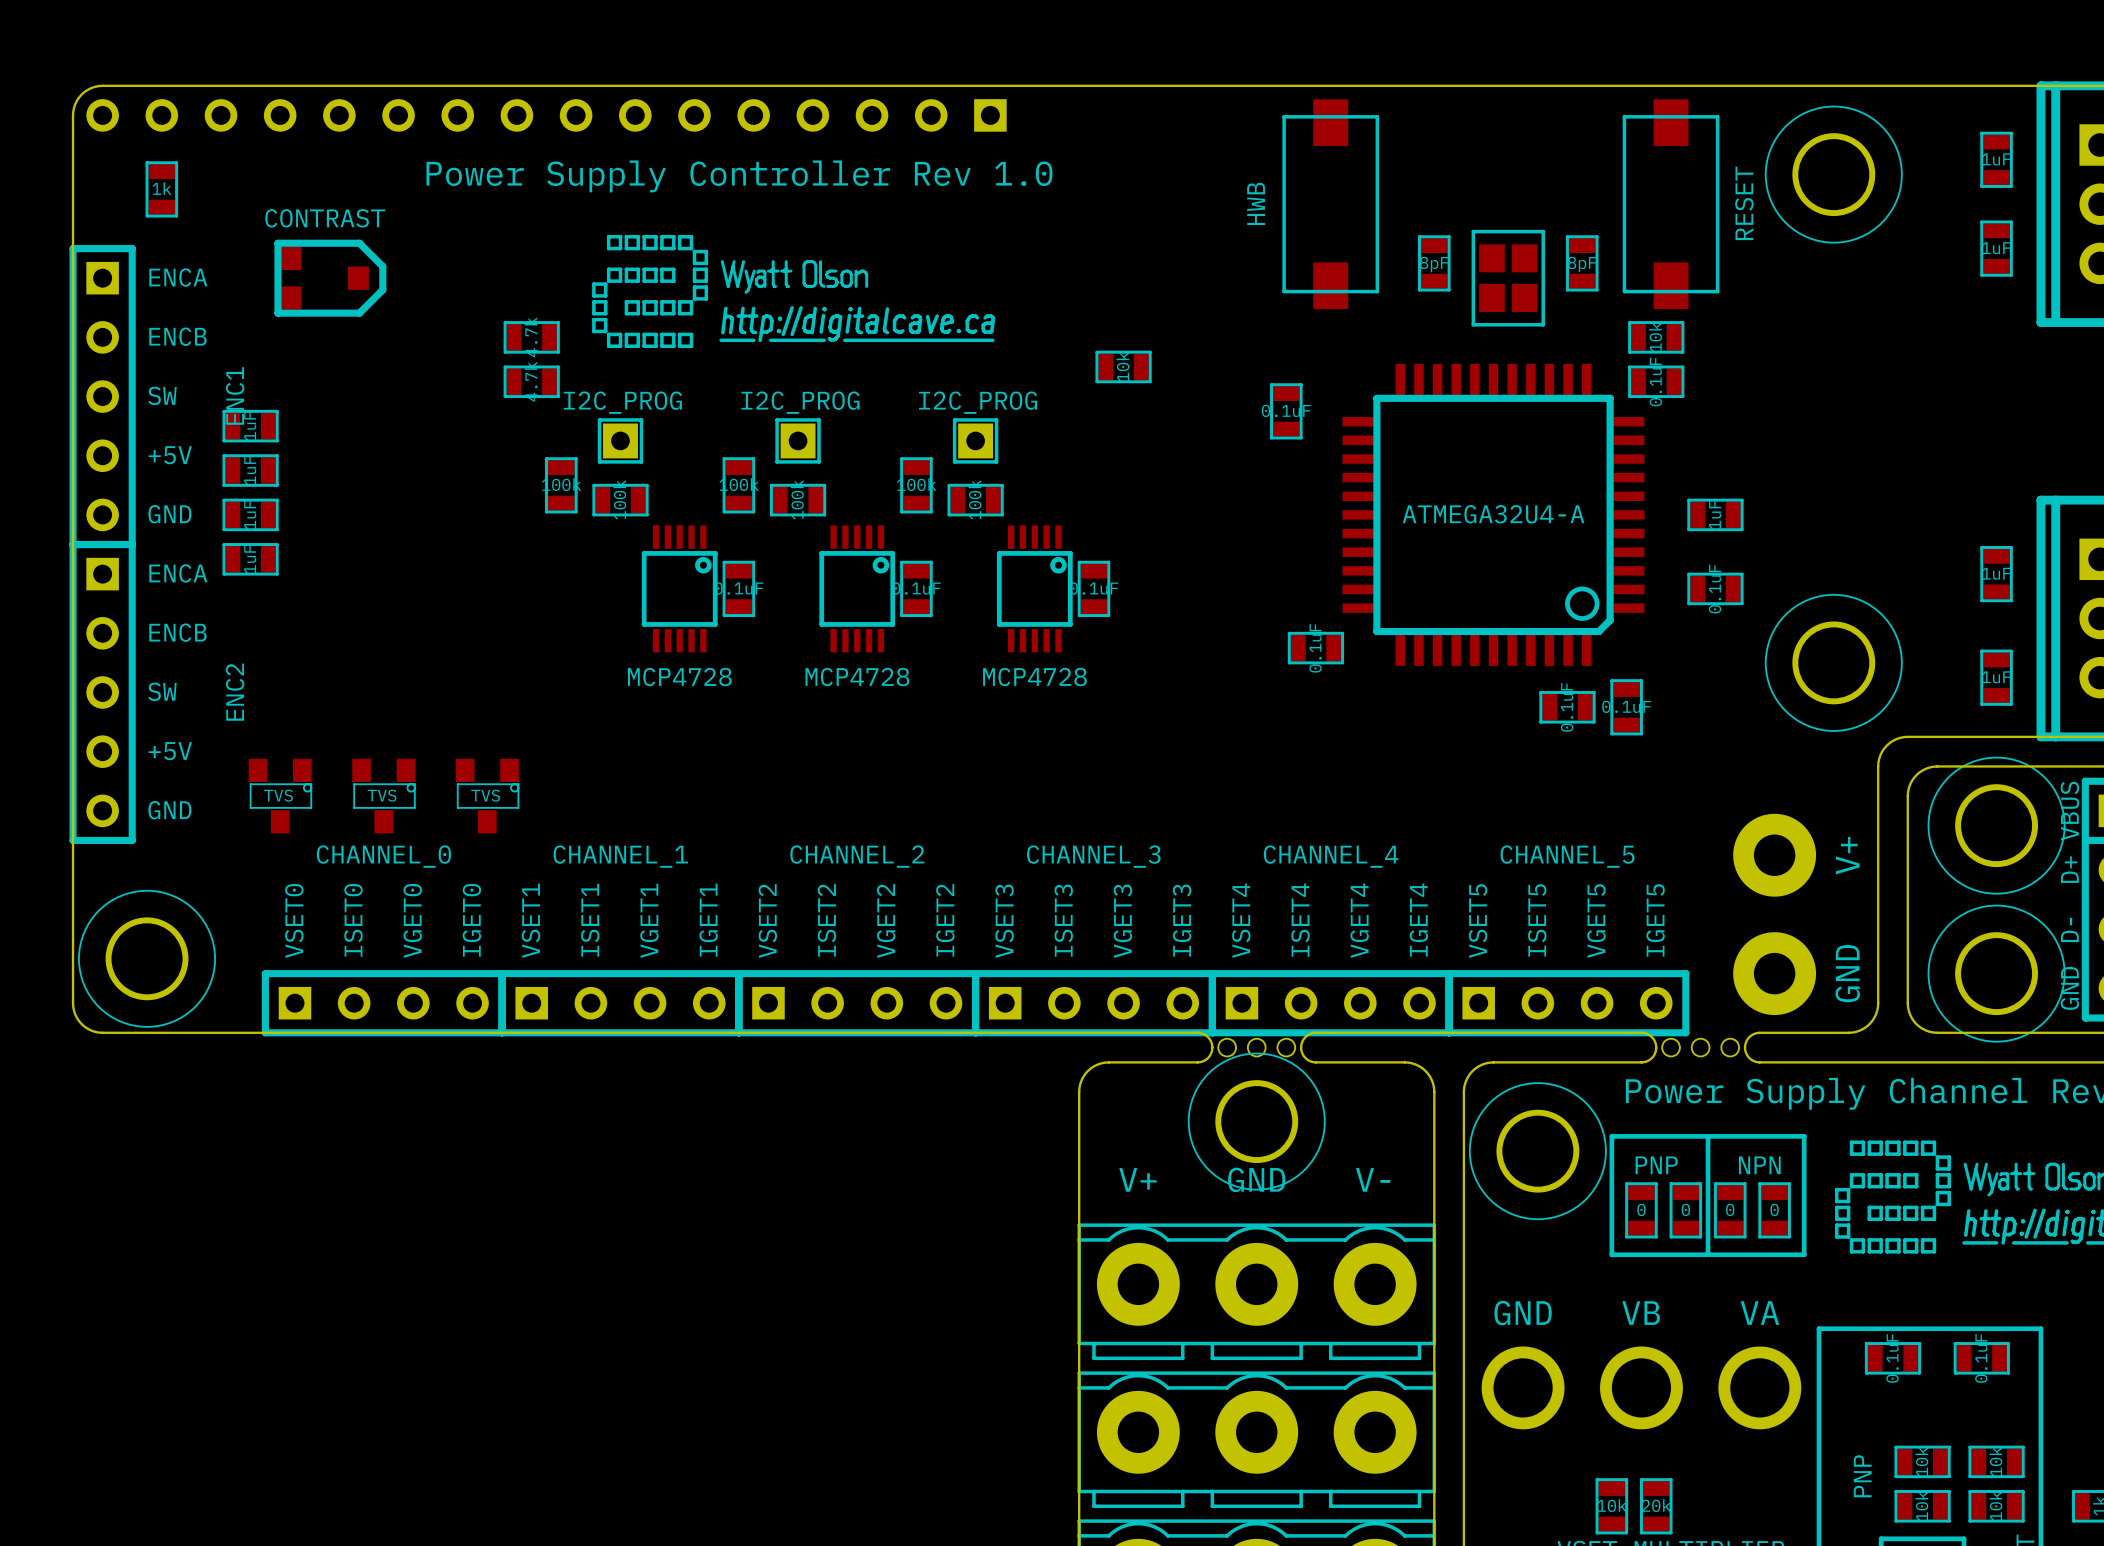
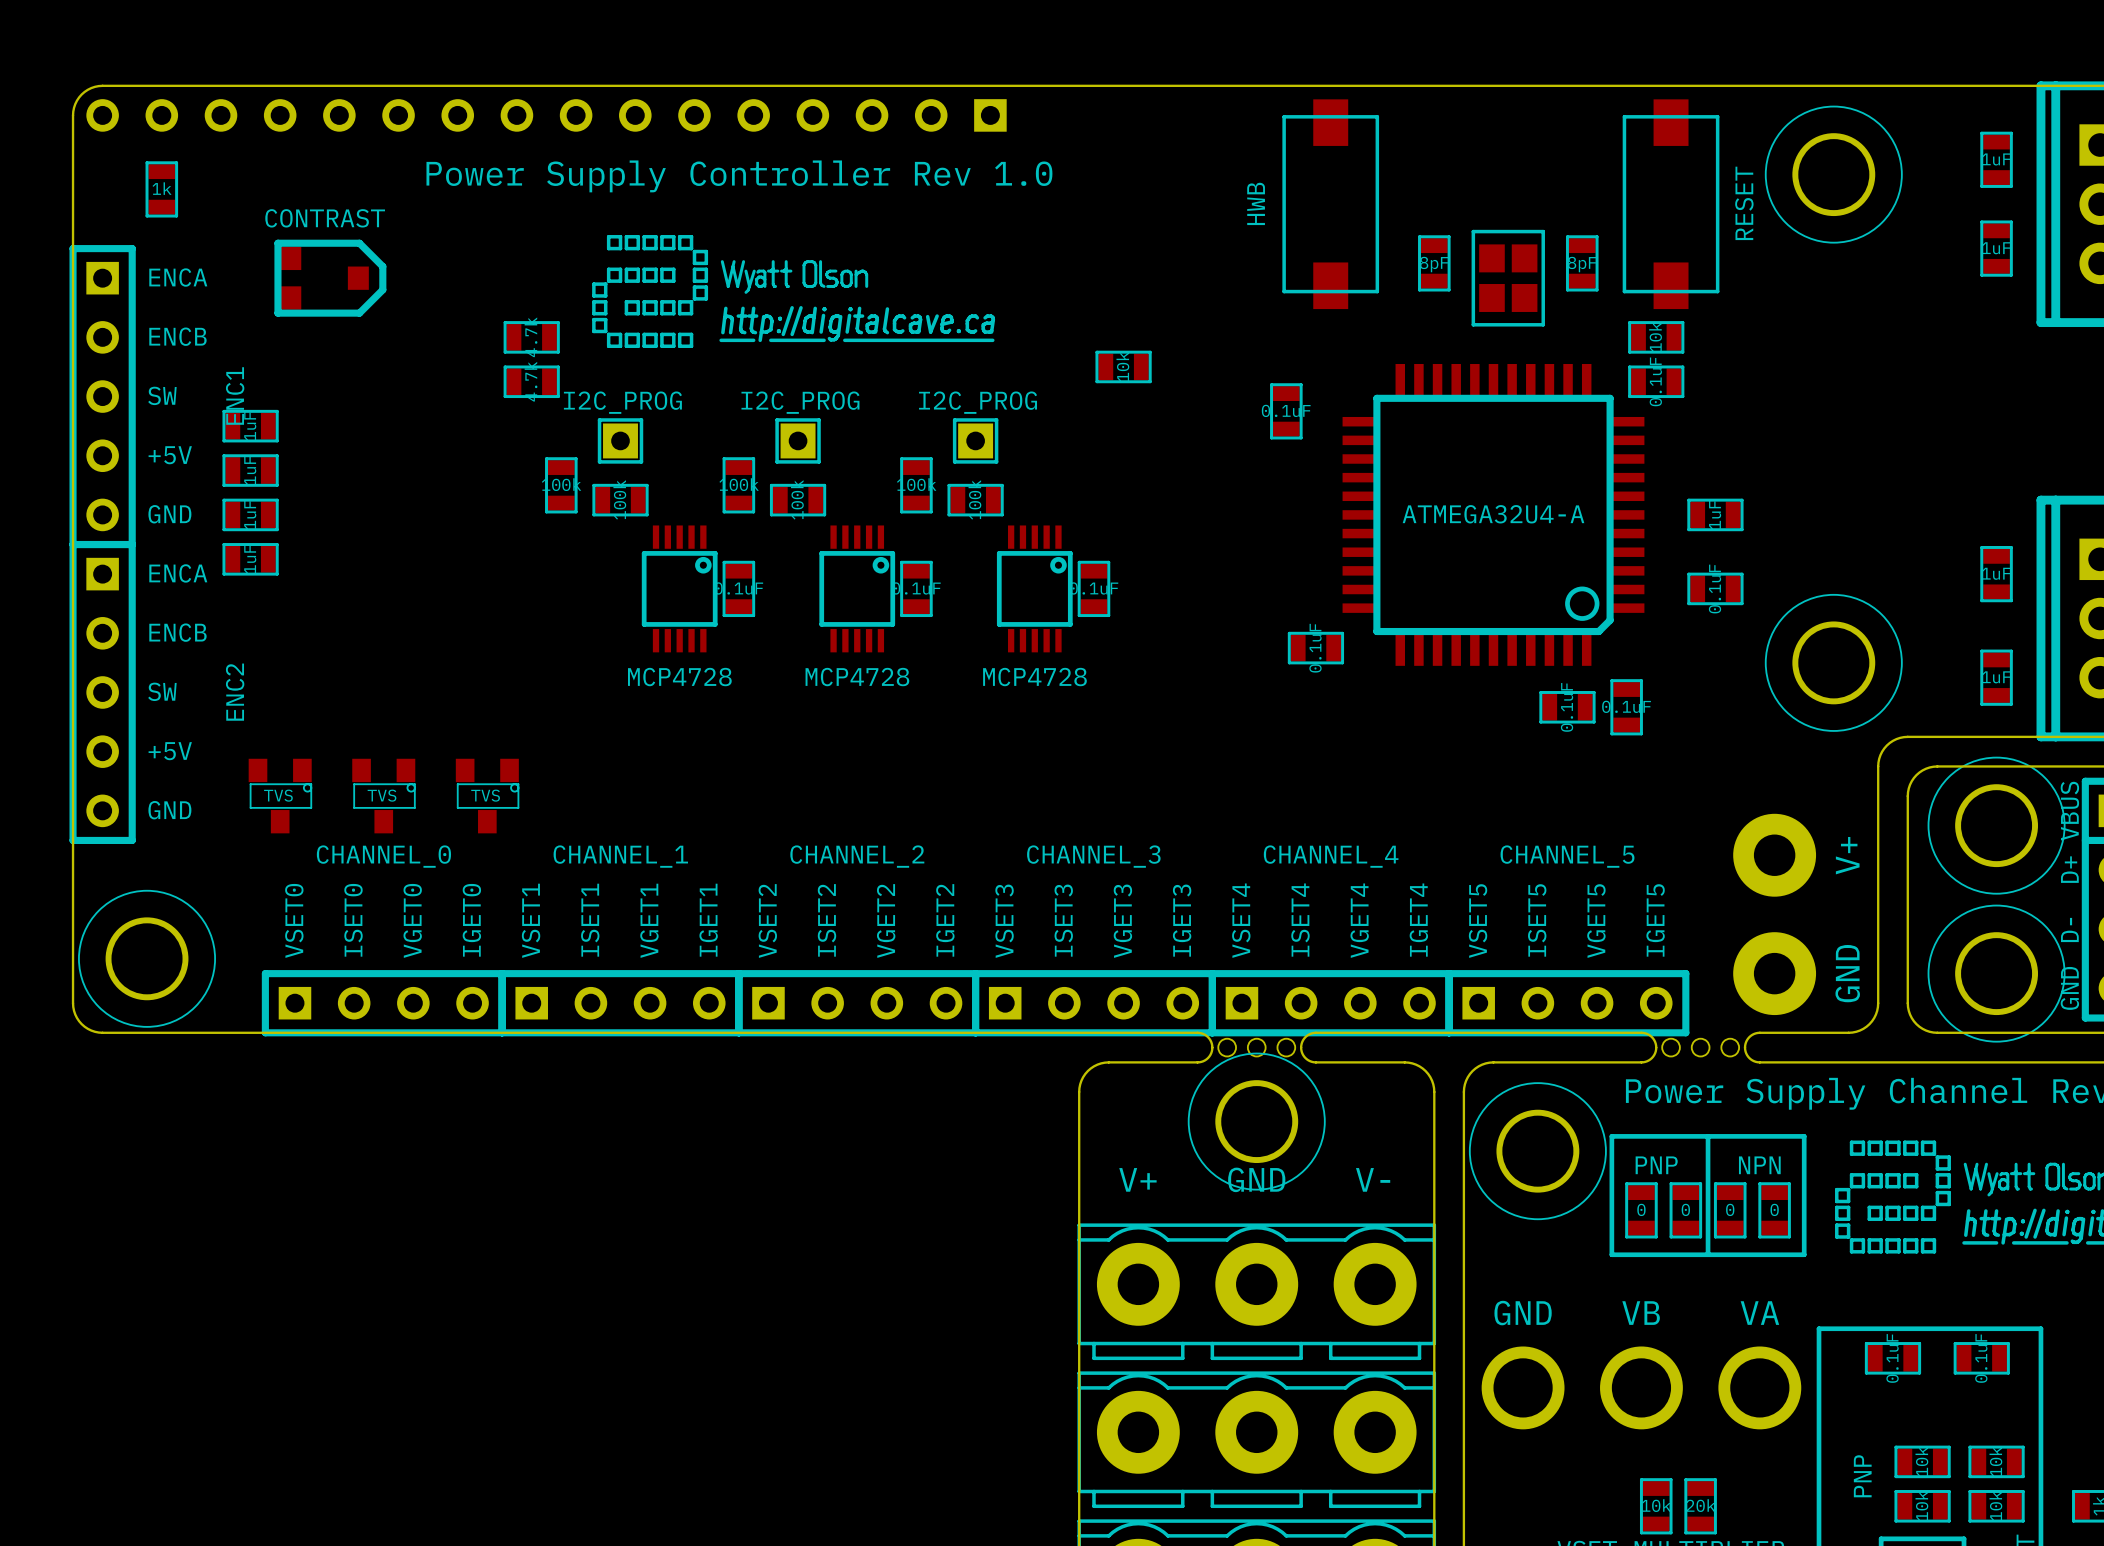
part value: 20k (1656, 1505) -> 10k (1656, 1505)
part: 10k (1611, 1506) -> none
part: none -> 20k (1700, 1506)

